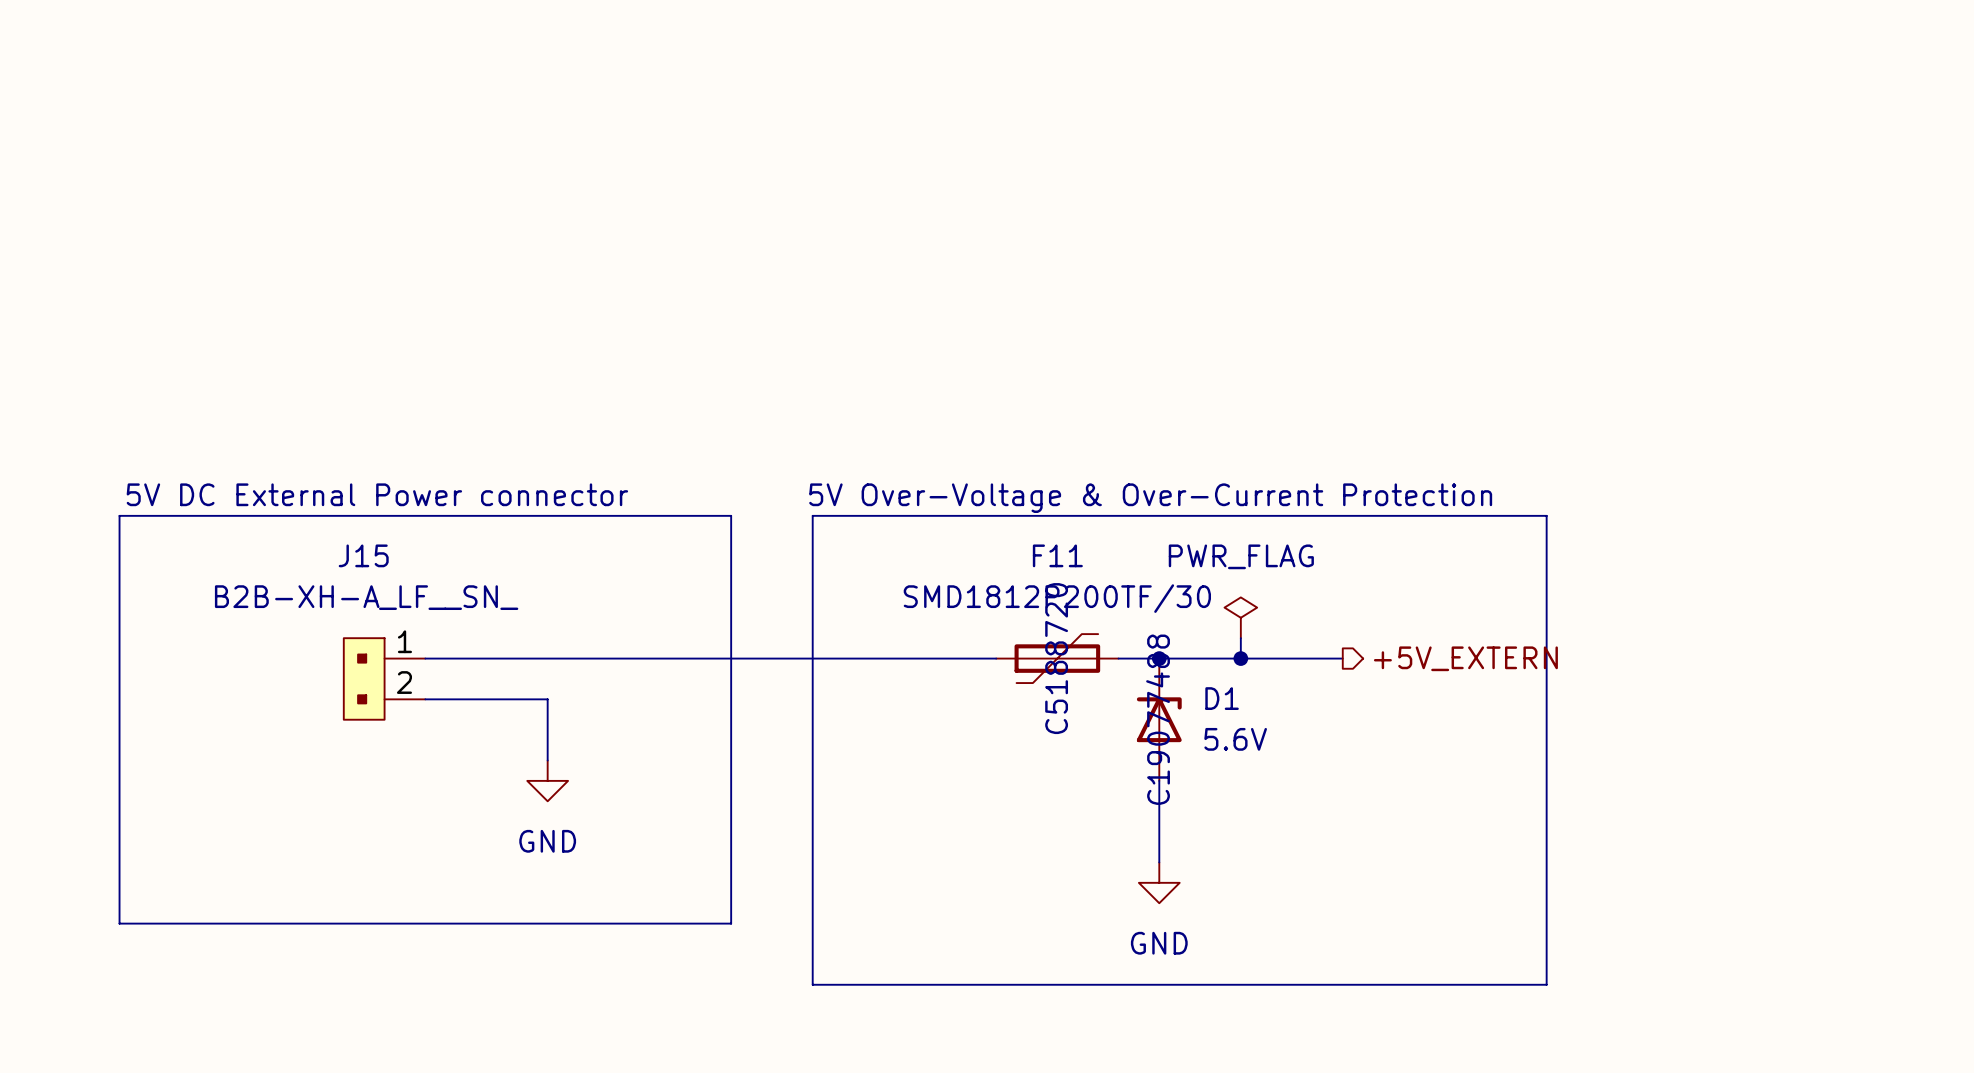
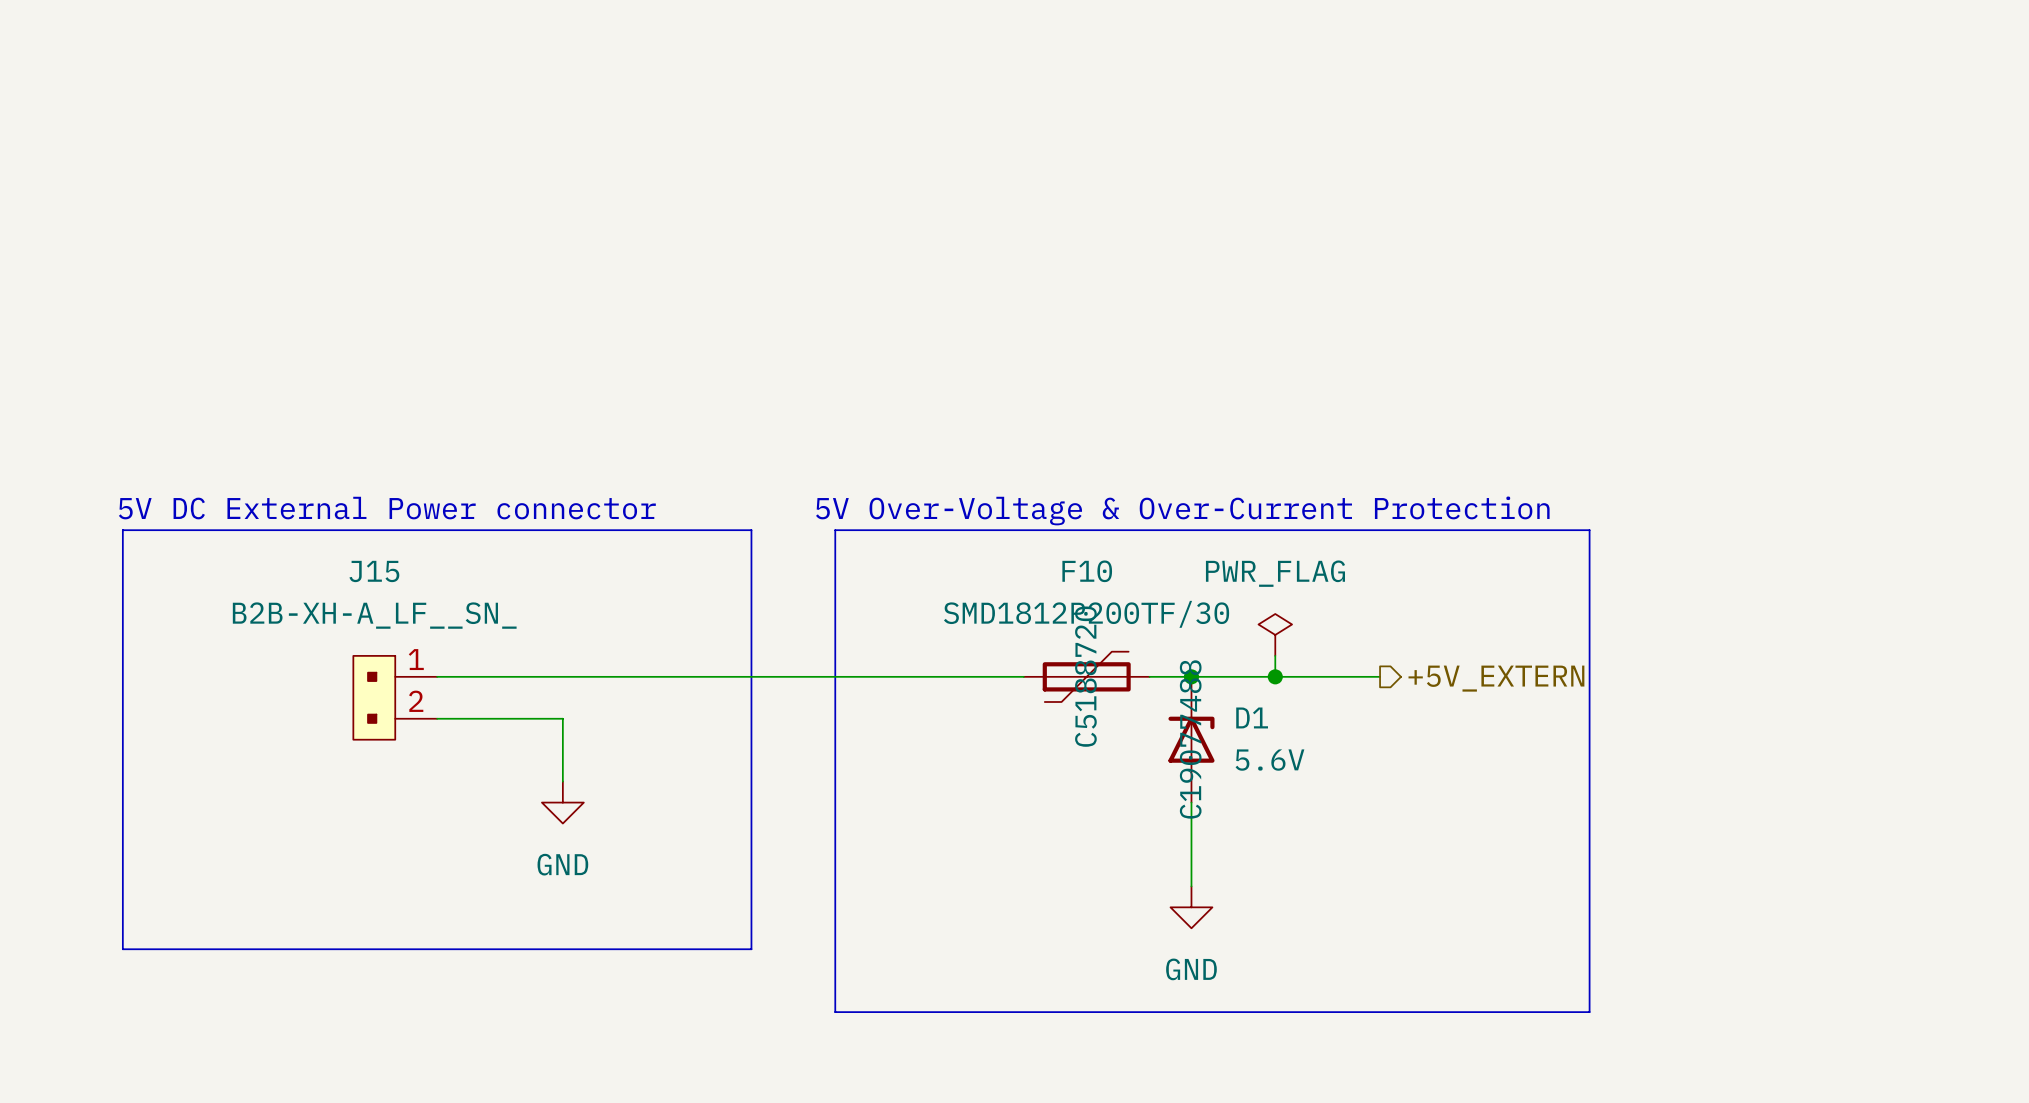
F11 name: F11 (1057, 555) -> F10 (1087, 571)

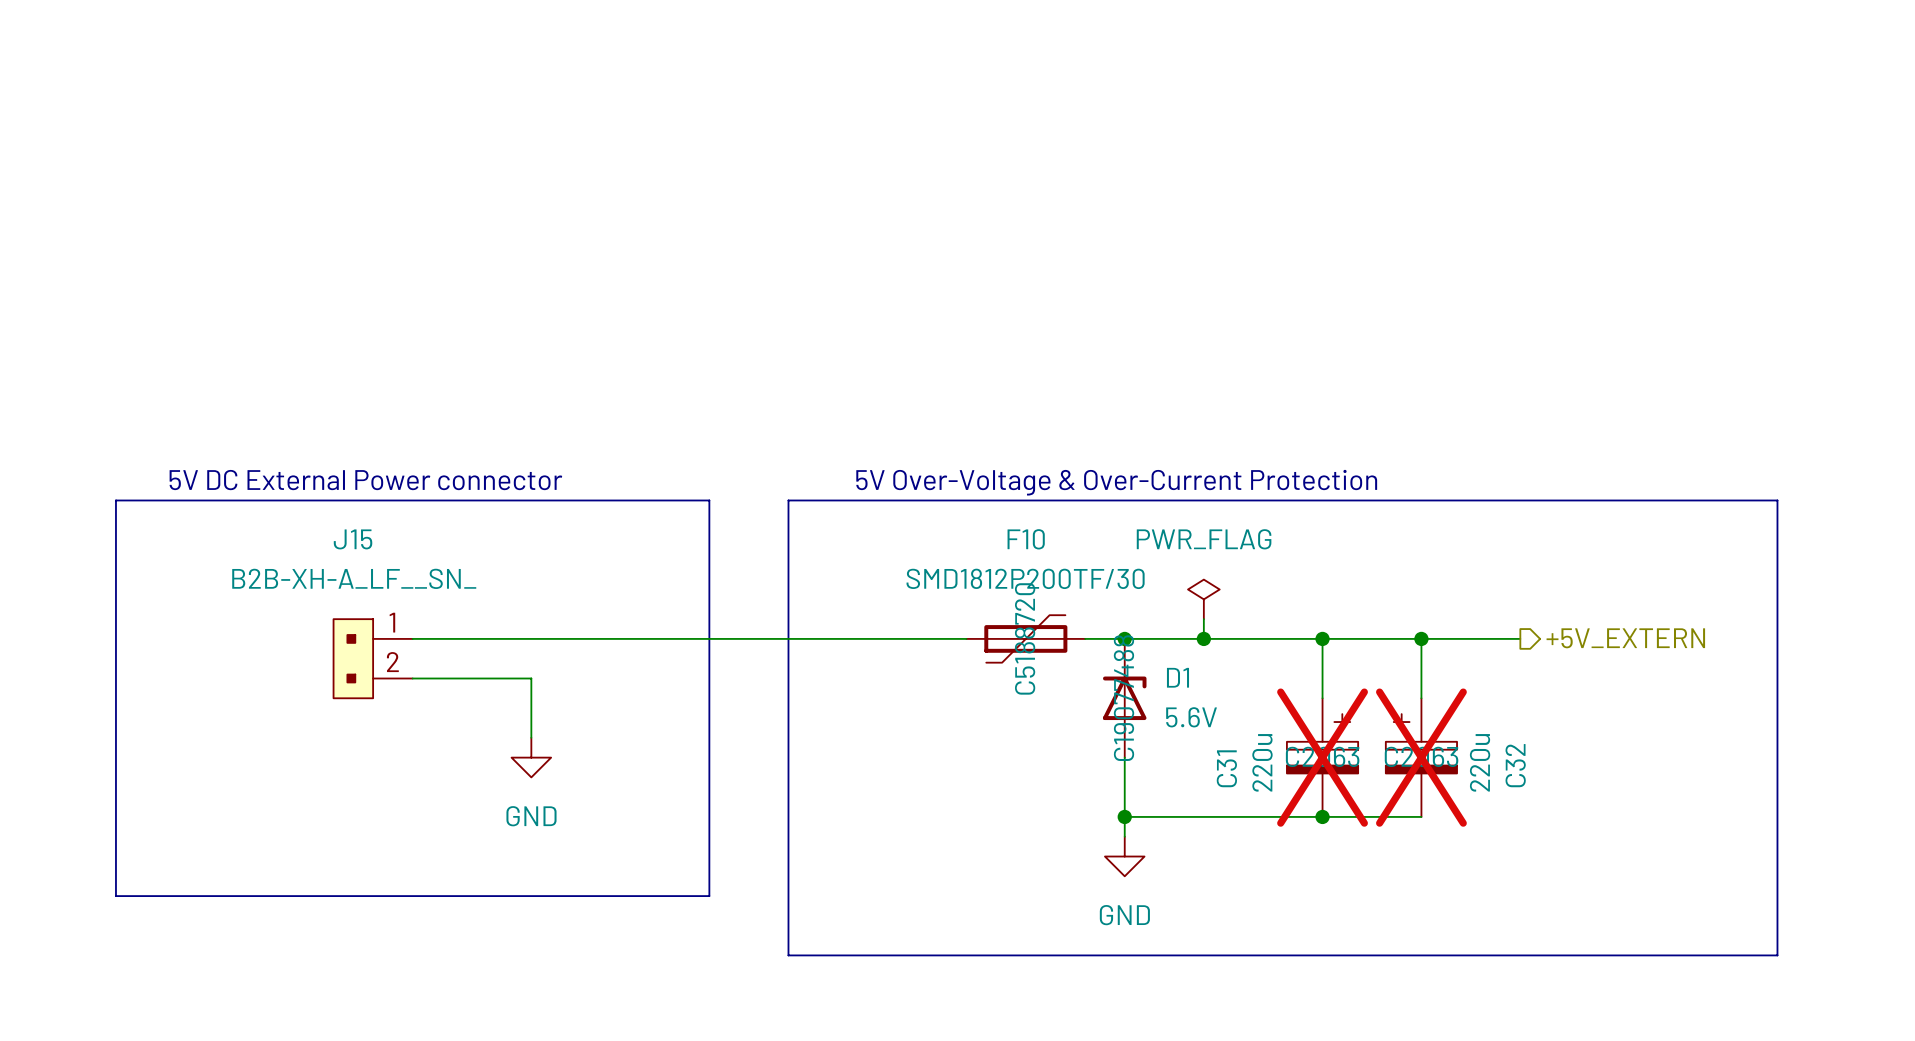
line: (1589, 530) (1589, 1012) -> (1500, 500) (1777, 500) (1777, 955) (1500, 955)
wire: none -> (1302, 638) (1520, 638)
wire: none -> (1322, 638) (1322, 698)
junction: none -> (1322, 638)
wire: none -> (1421, 638) (1421, 698)
junction: none -> (1421, 638)
hierarchical label position: +5V_EXTERN (1496, 678) -> +5V_EXTERN (1625, 638)
C31: none -> 220u (1322, 757)
C32: none -> 220u (1421, 757)
wire: none -> (1124, 816) (1421, 816)
junction: none -> (1124, 816)
junction: none -> (1322, 816)

